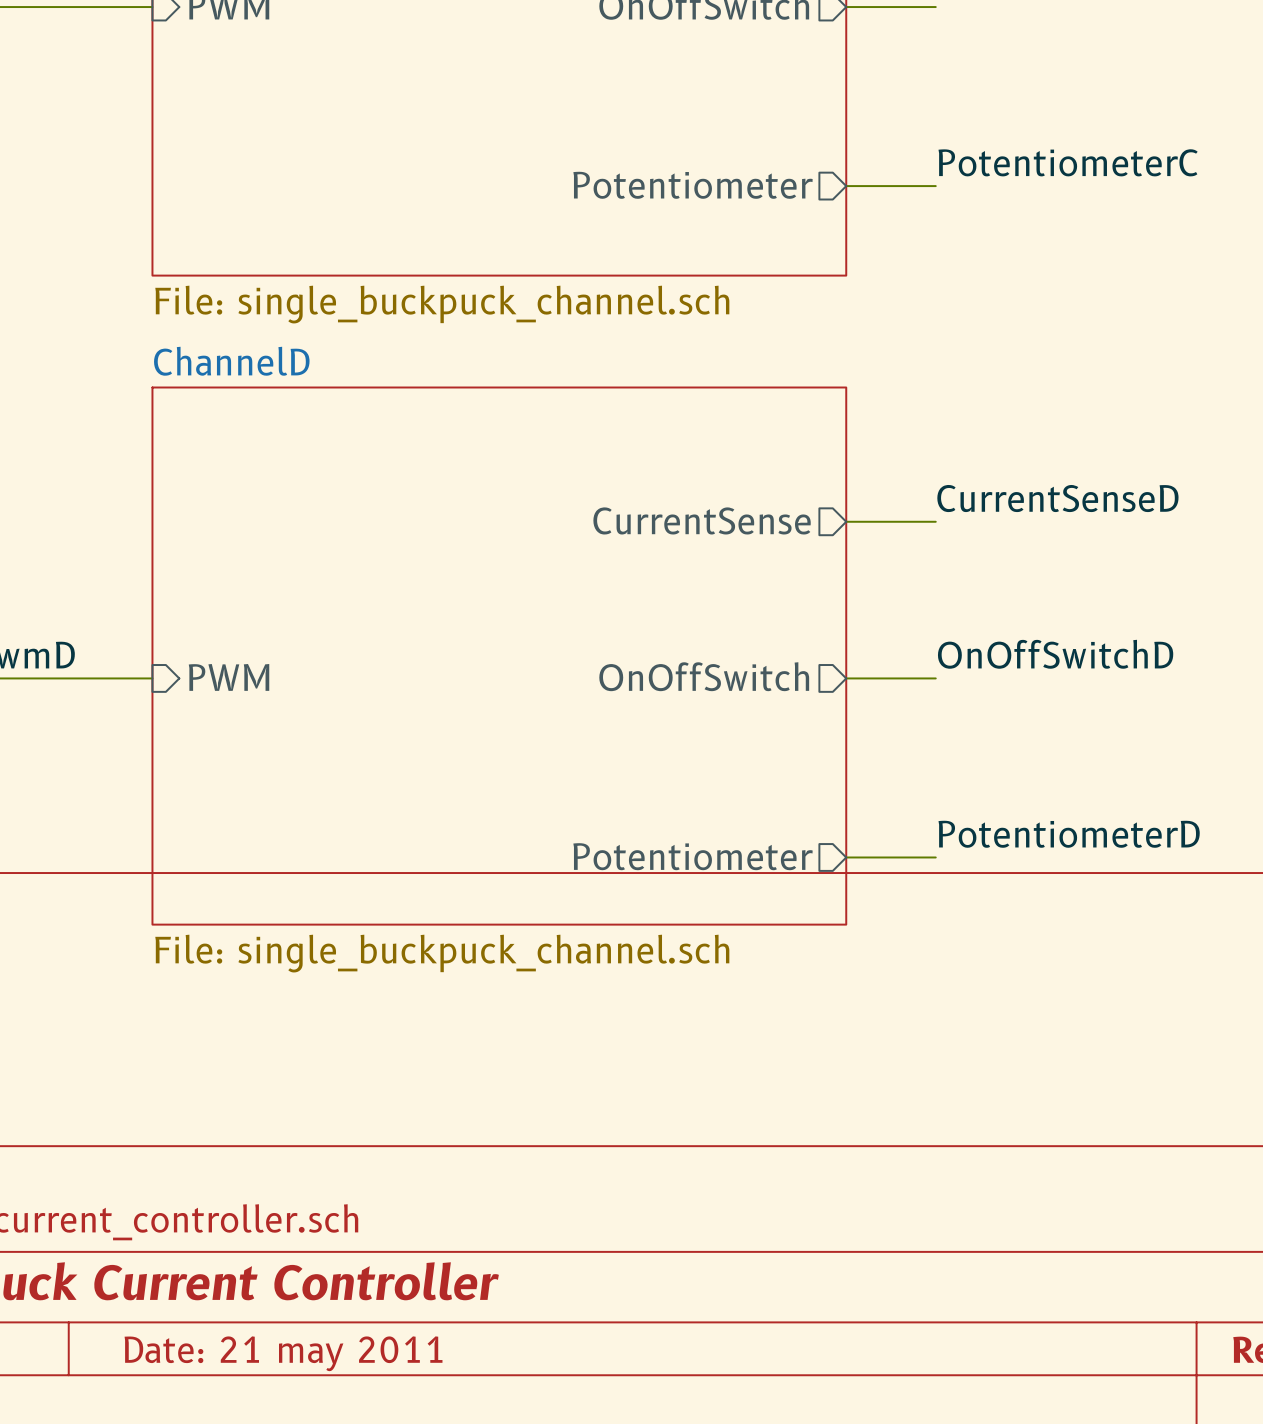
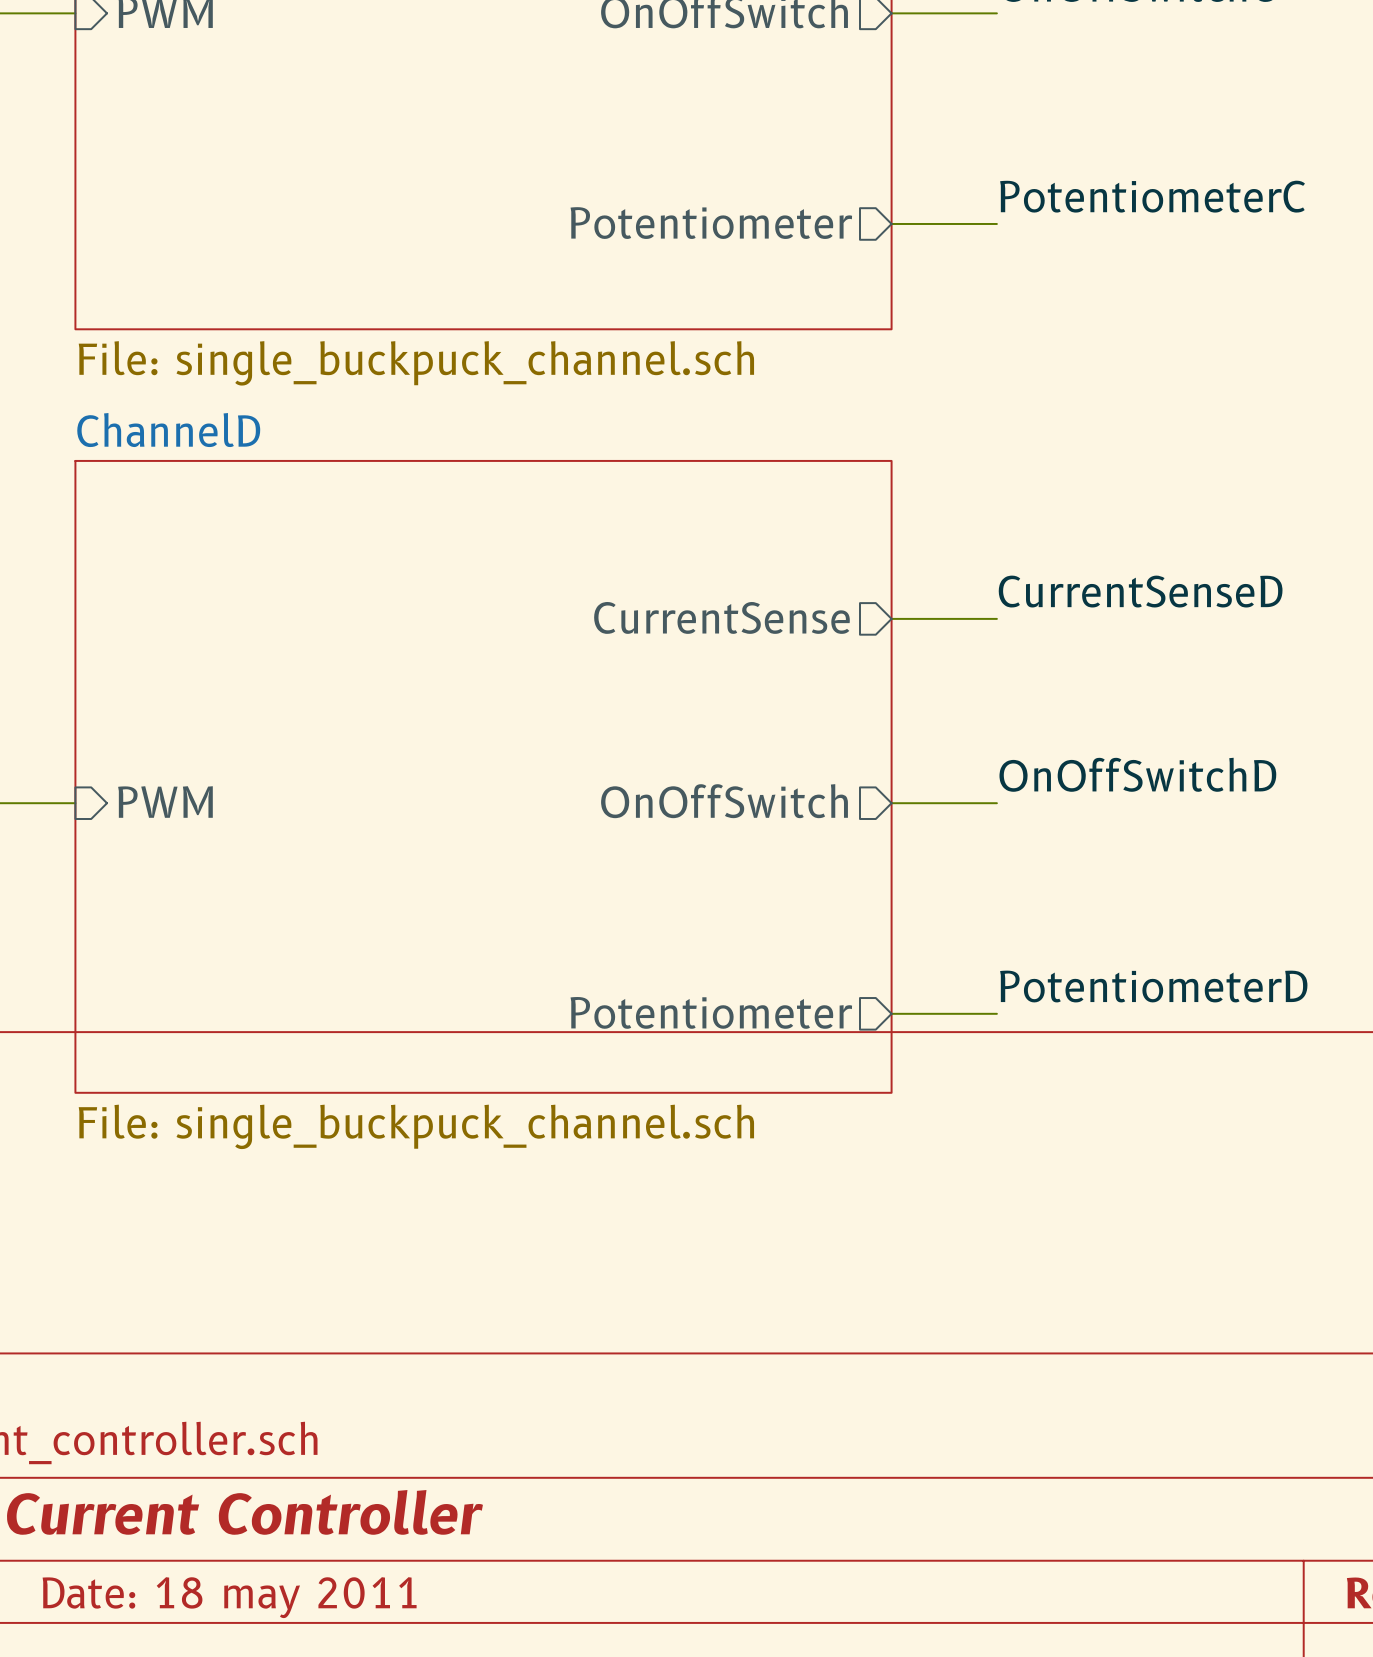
title block: Date: 21 may 2011 (283, 1353) -> Date: 18 may 2011 (229, 1597)

